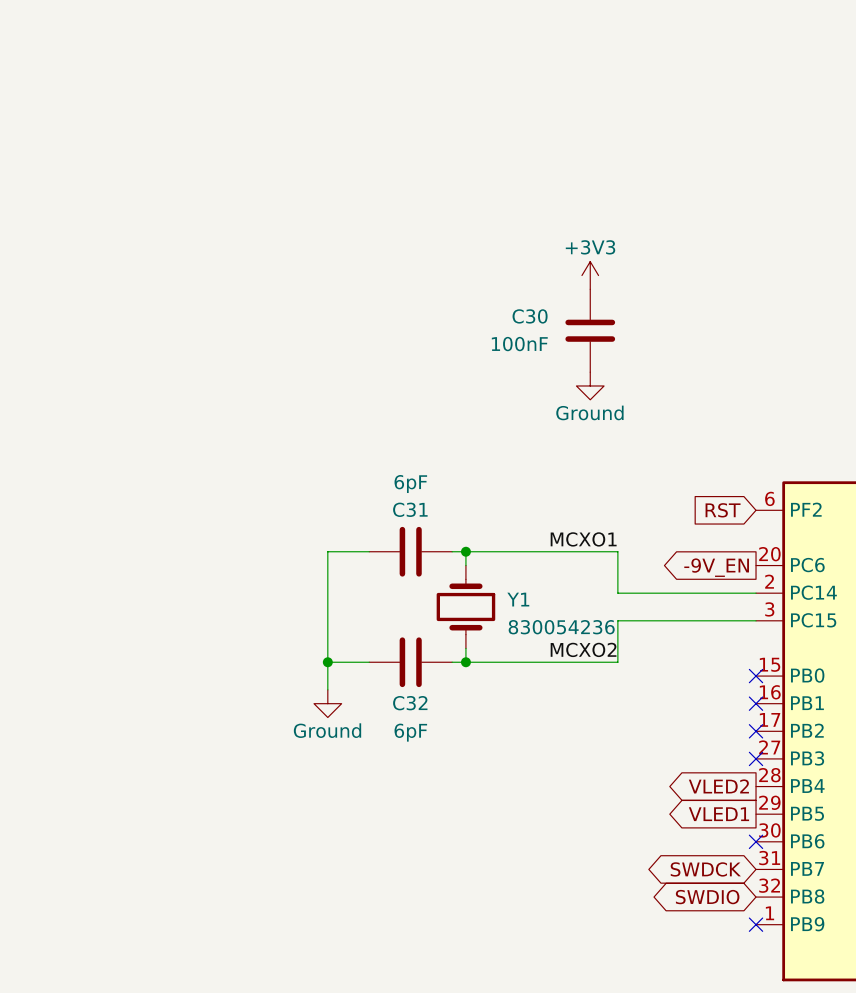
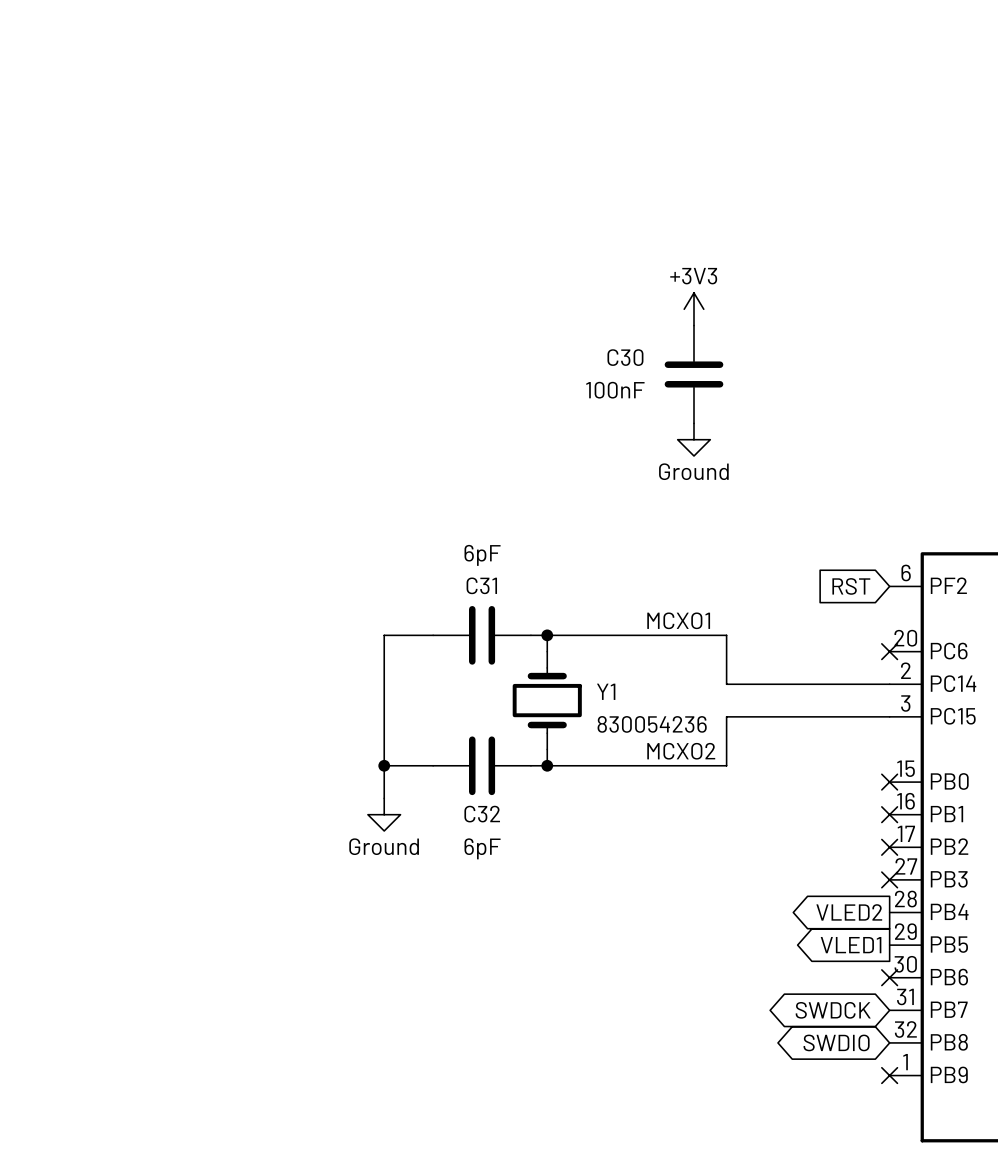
no-connect mark: none -> (889, 651)
global label: -9V_EN (716, 567) -> none

